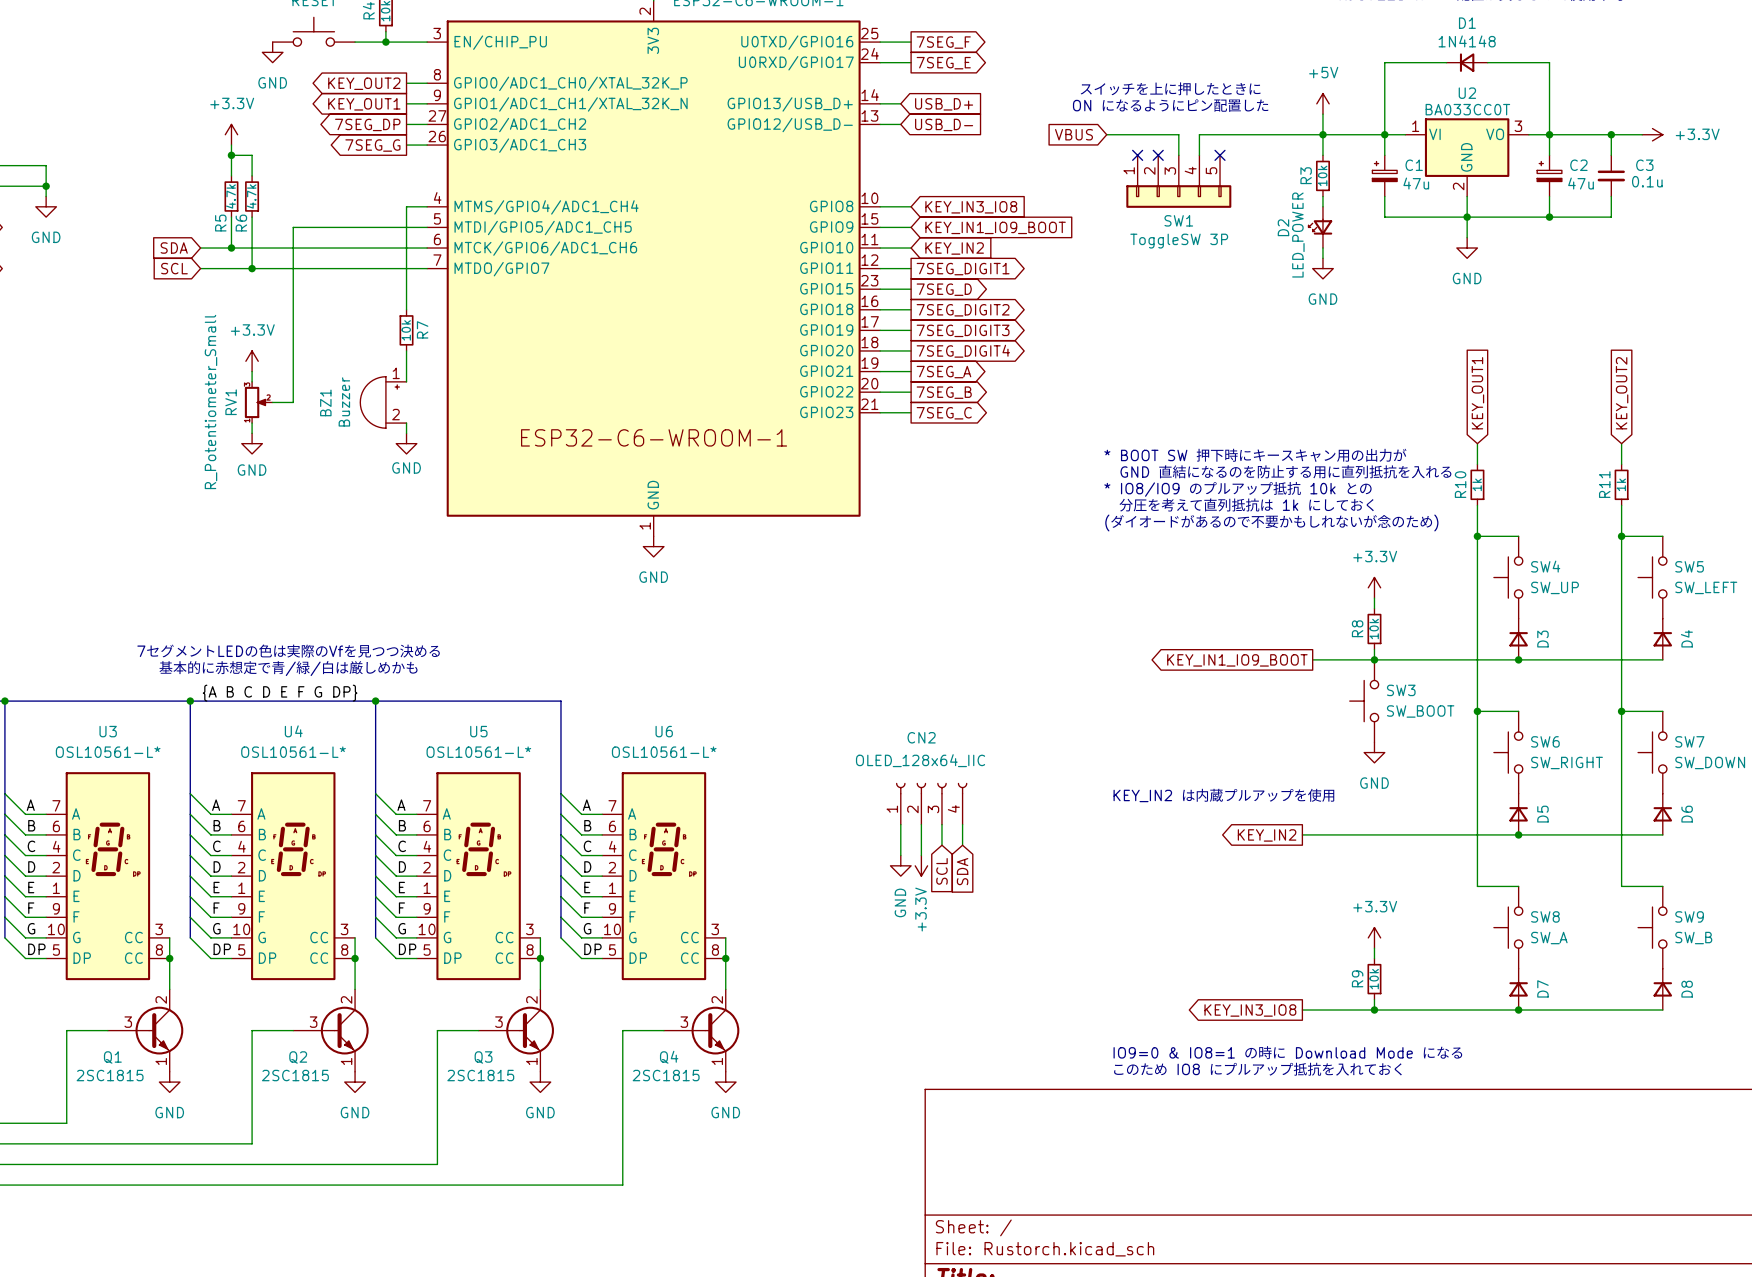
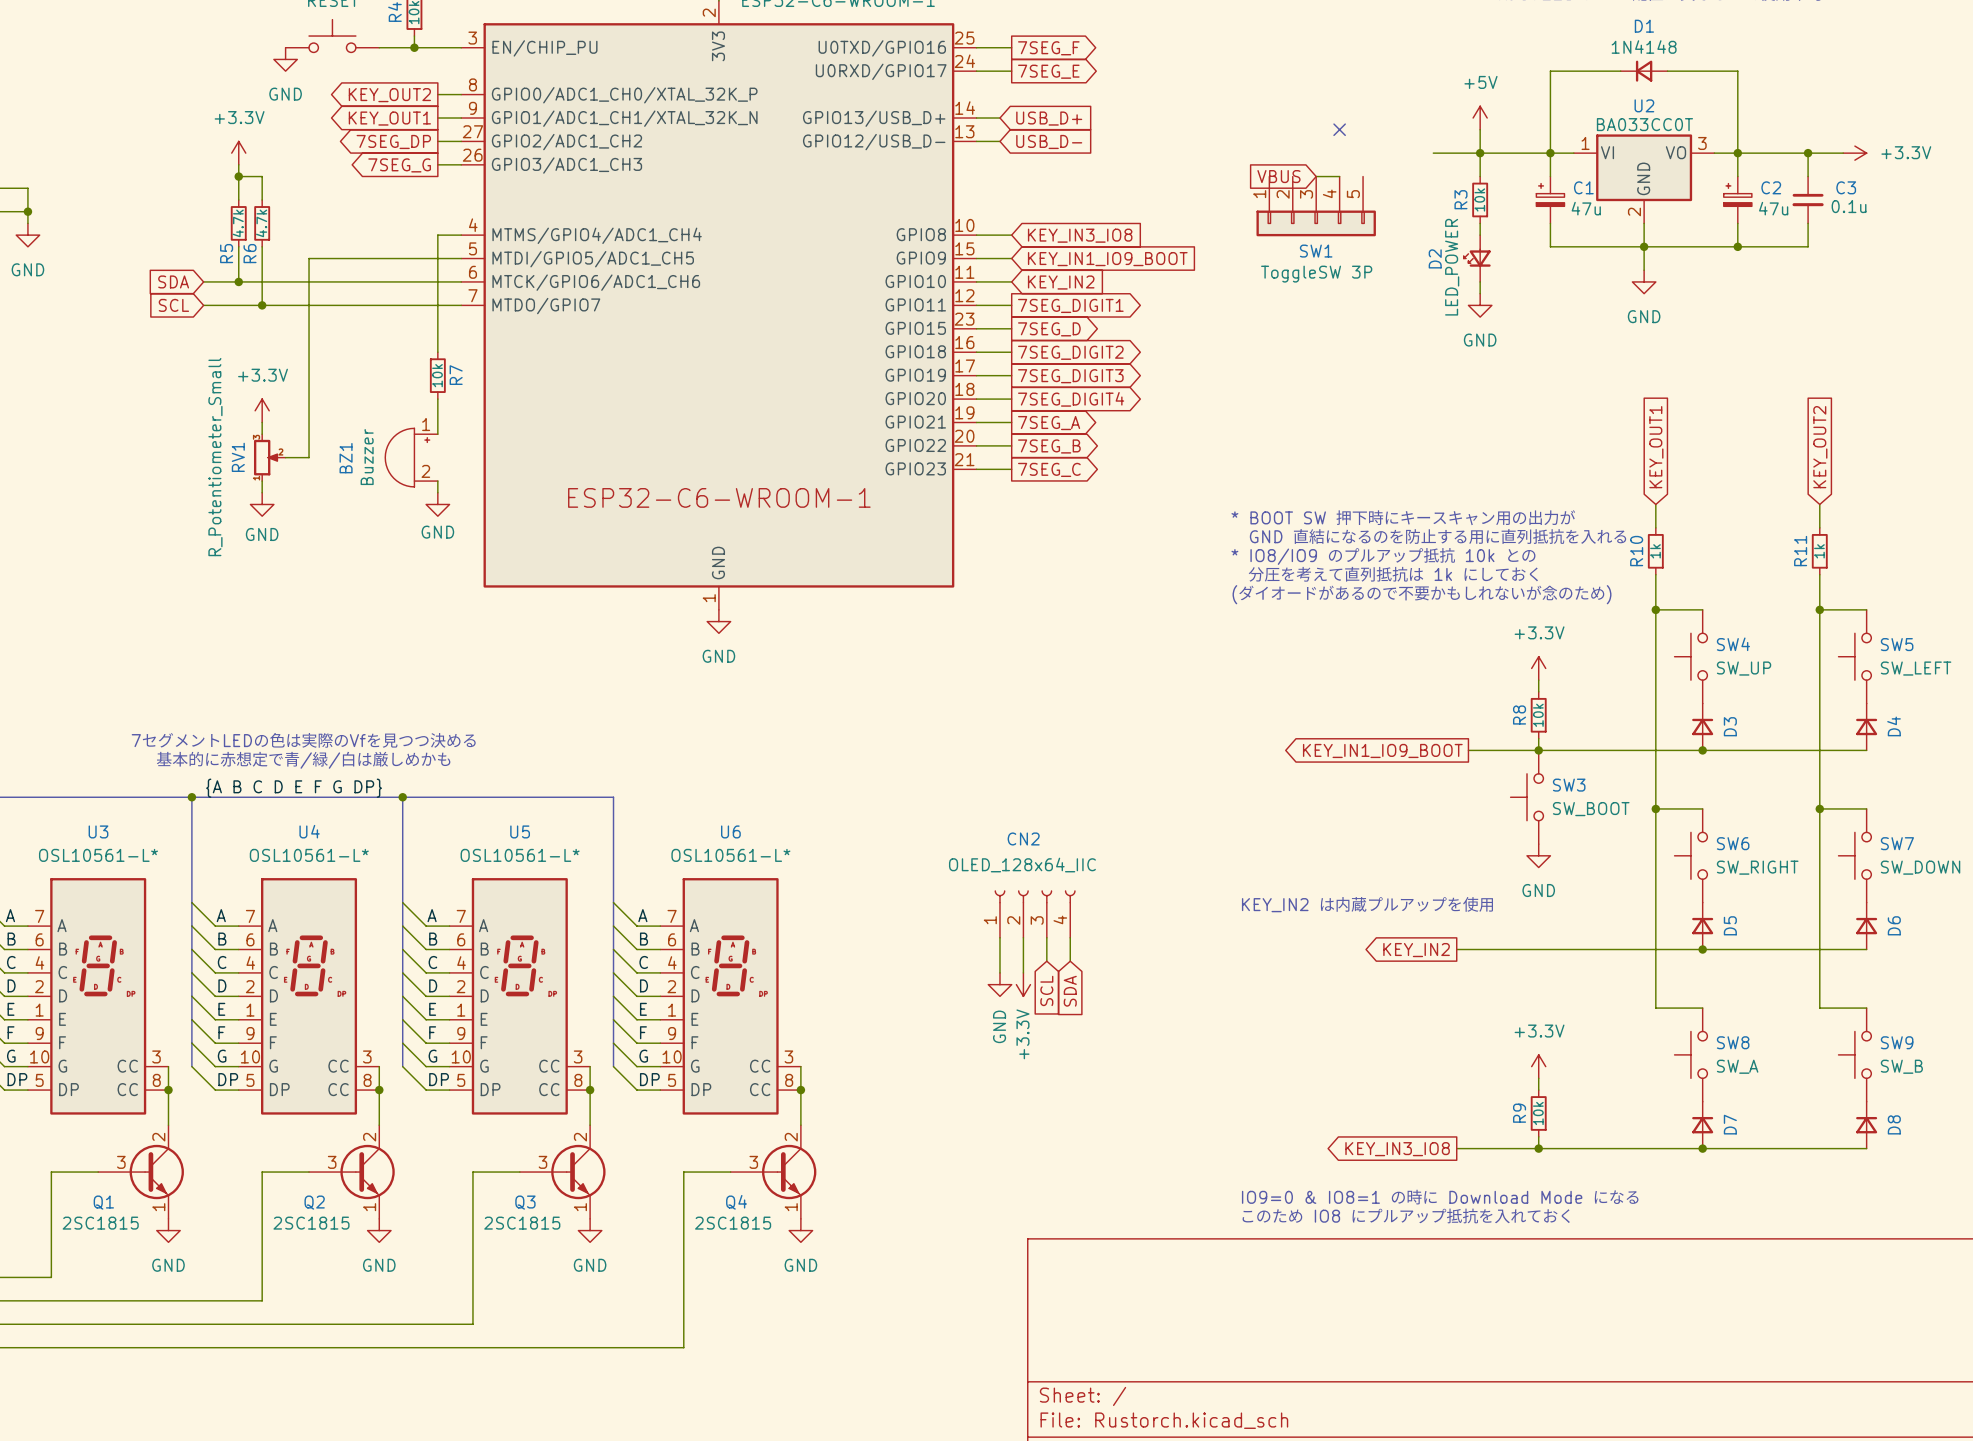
text: スイッチを上に押したときに (1170, 88) -> none
text: ON になるようにピン配置した (1170, 105) -> none
no-connect mark: none -> (1339, 129)
global label position: VBUS (1073, 134) -> VBUS (1278, 176)
wire: (1106, 134) (1178, 134) (1178, 155) -> (1339, 176) (1316, 176)
wire: (1281, 134) (1199, 134) (1199, 155) -> none
no-connect mark: (1137, 155) -> none
no-connect mark: (1158, 155) -> none
no-connect mark: (1220, 155) -> none

